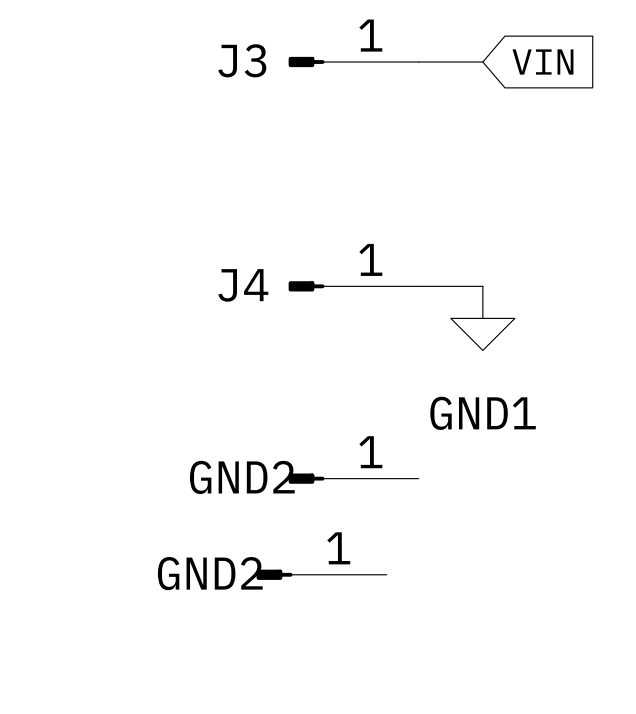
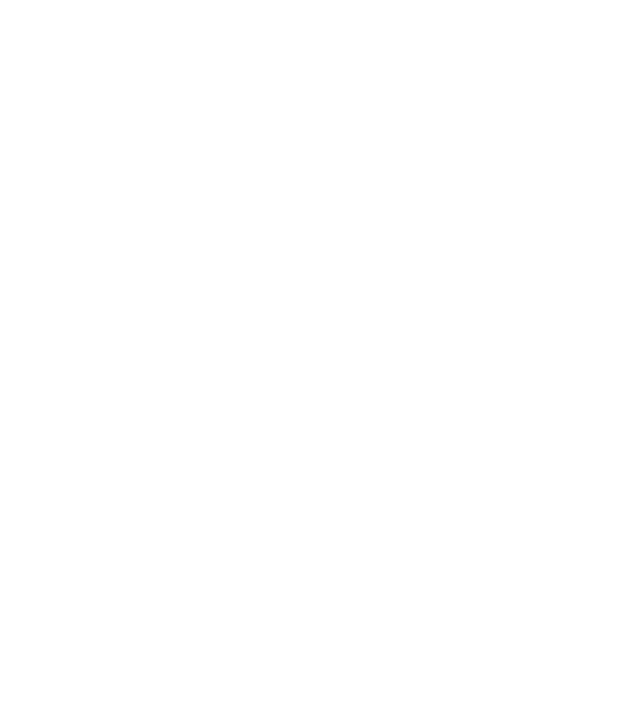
J3: (353, 62) -> none
wire: (418, 62) (482, 62) -> none
global label: VIN (542, 62) -> none
J4: (353, 286) -> none
wire: (418, 286) (482, 286) -> none
power symbol: GND1 (482, 318) -> none
GND2: (353, 478) -> none
GND2: (321, 574) -> none

